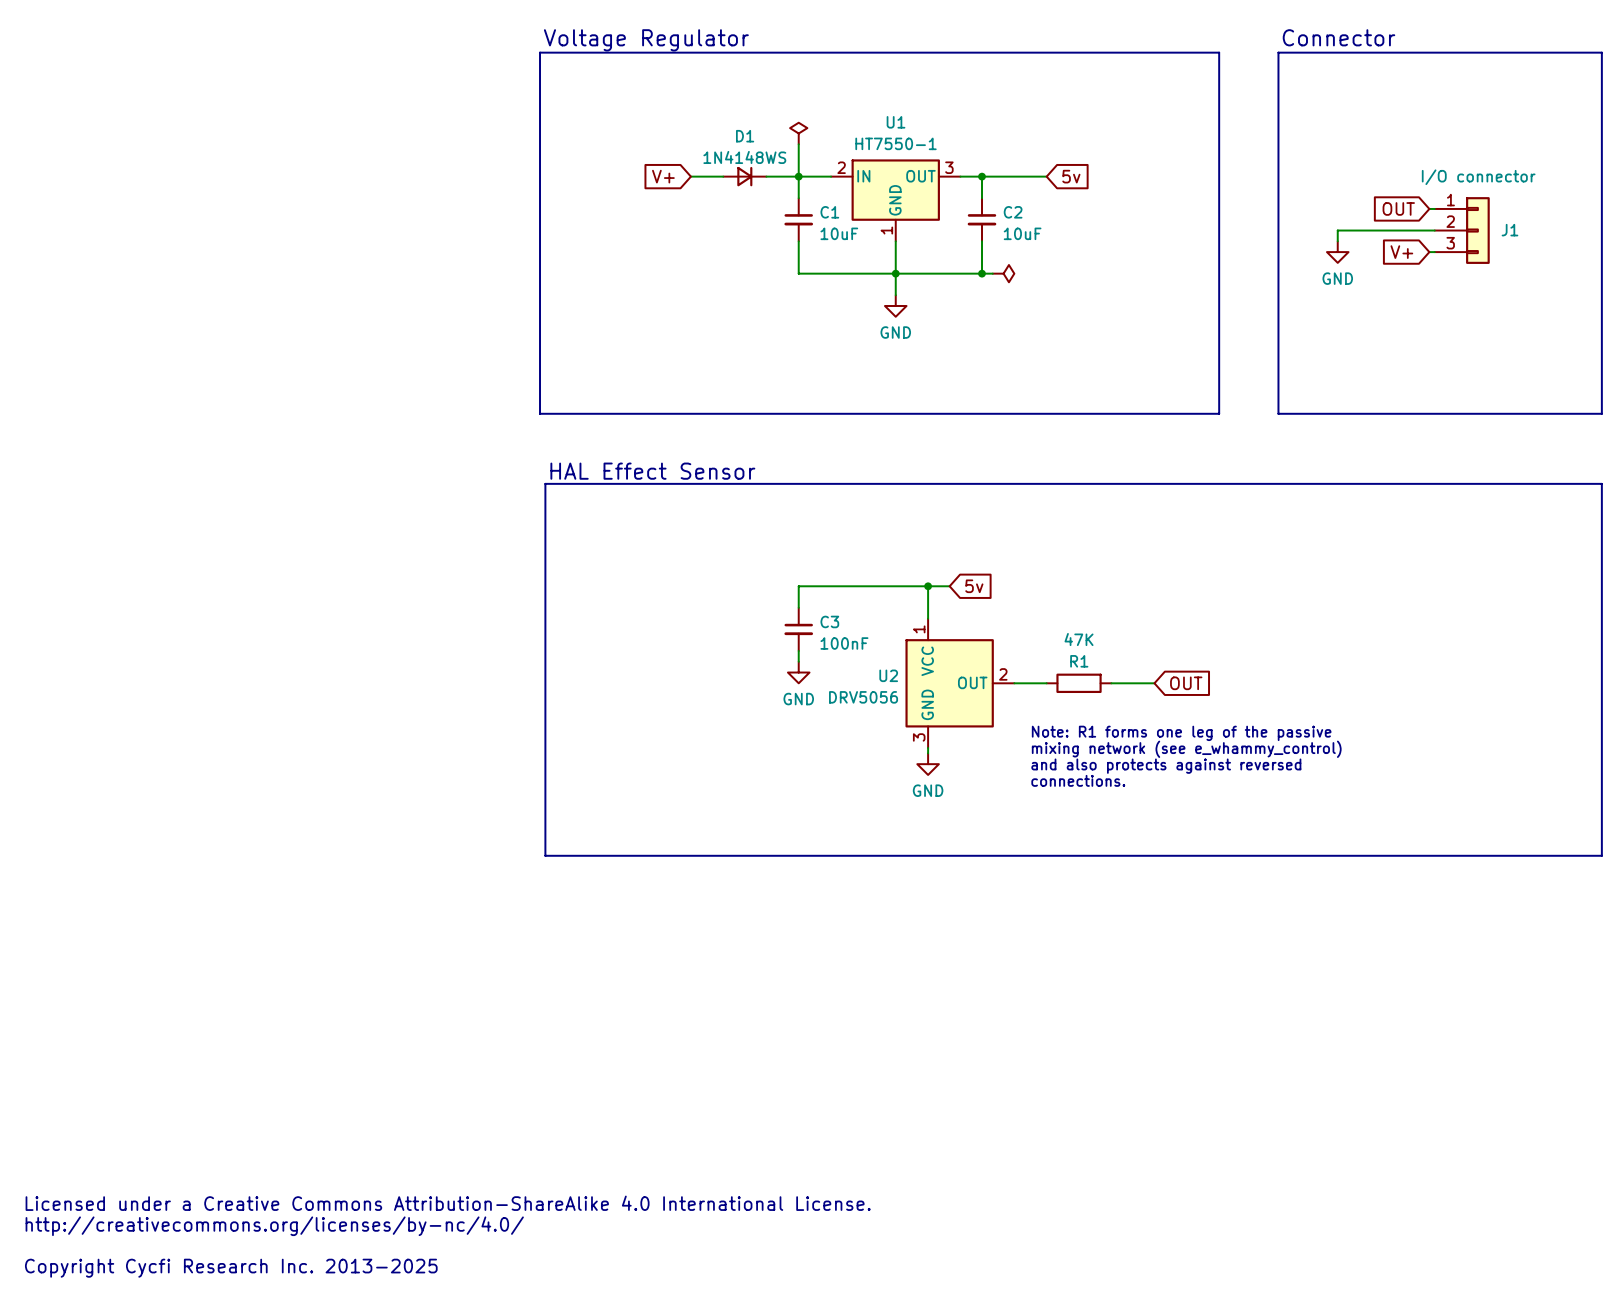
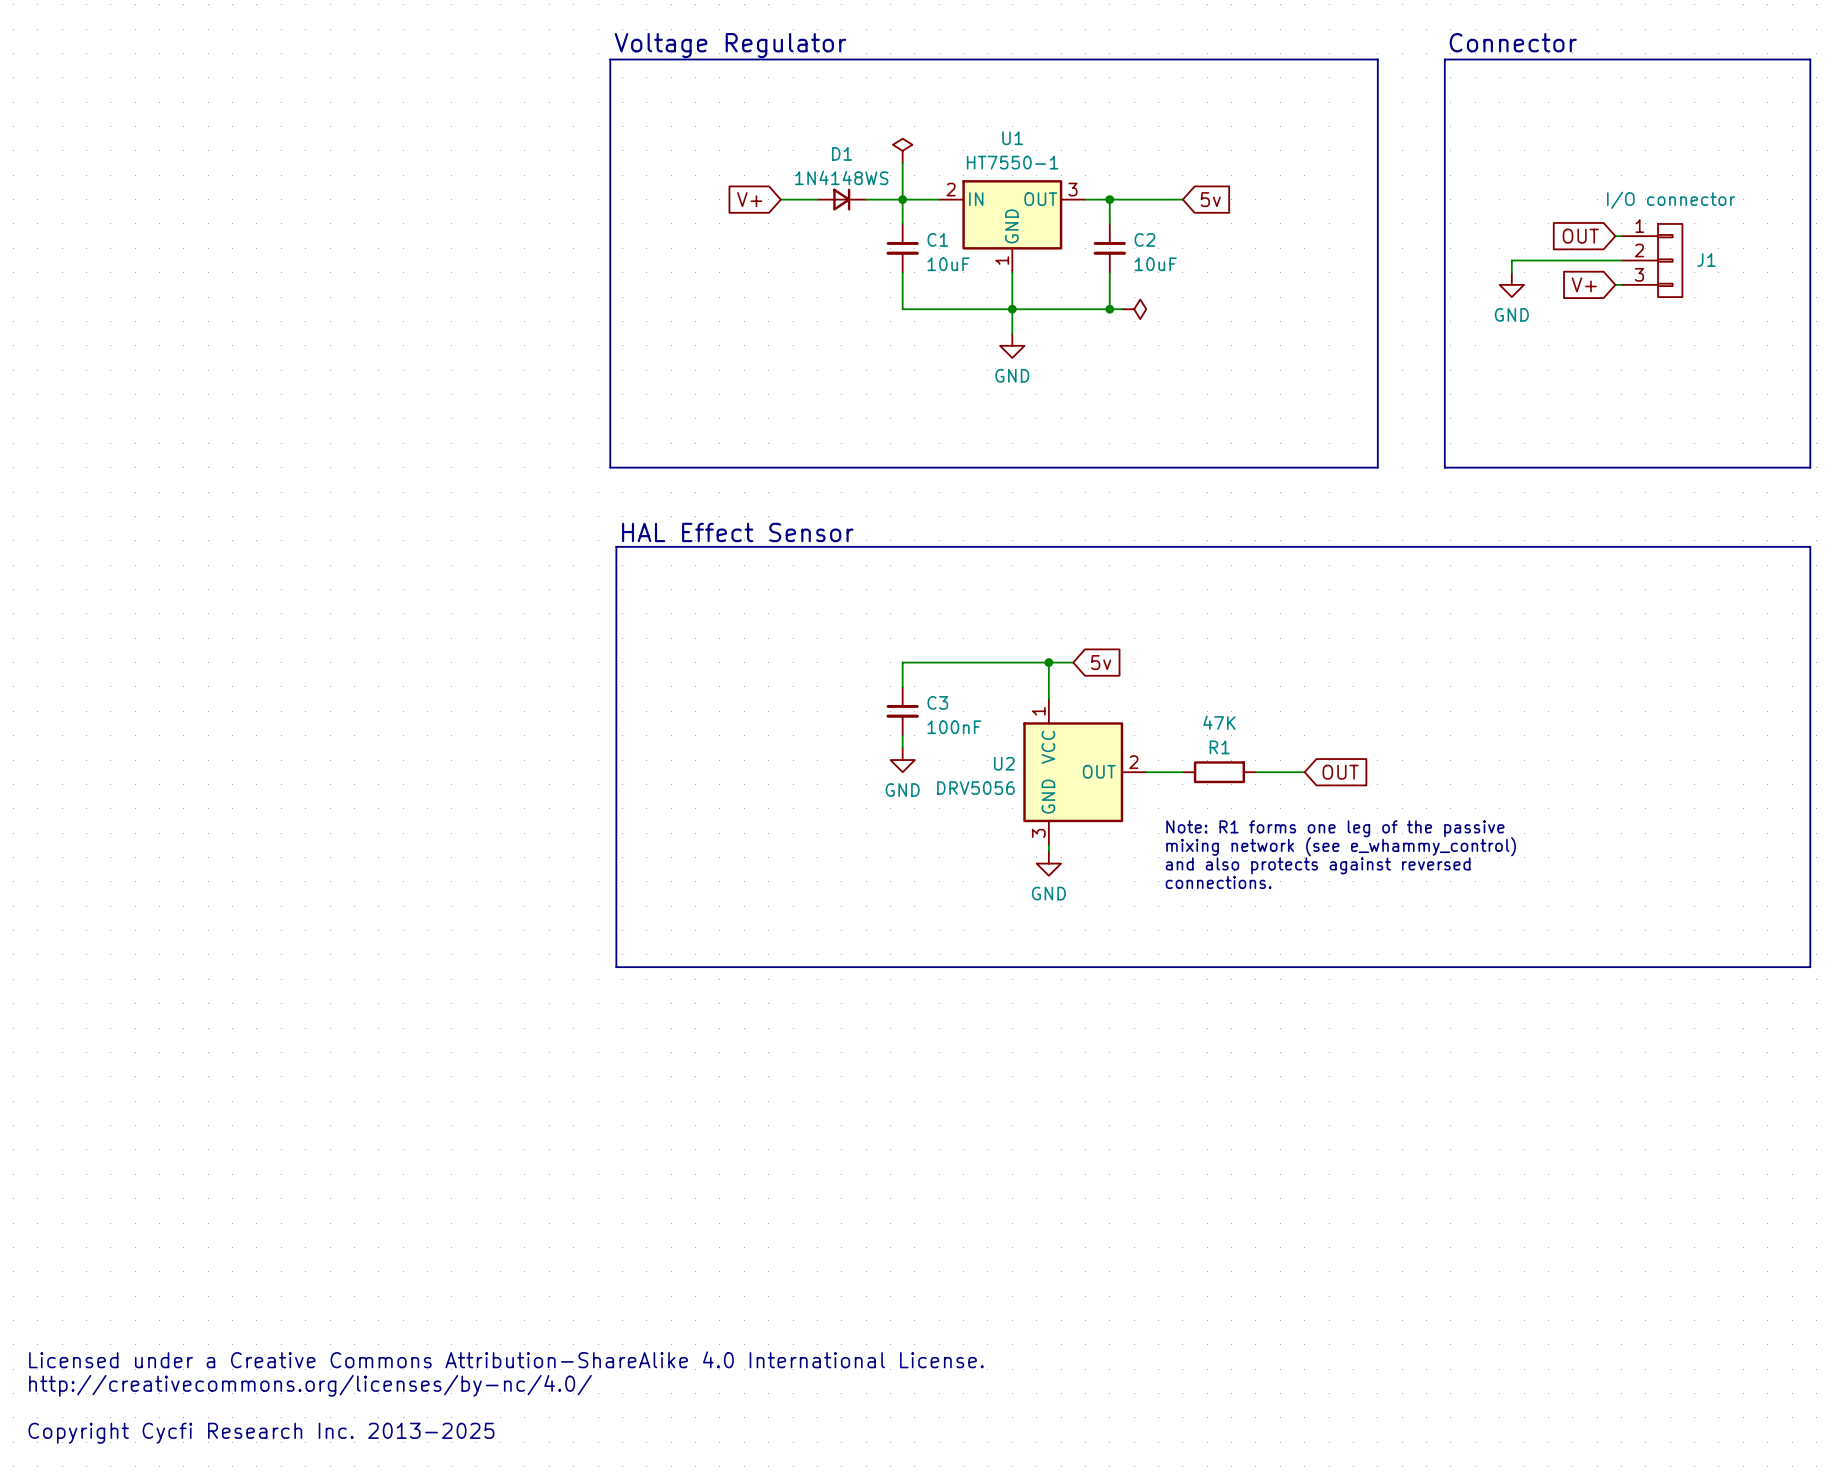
J1 symbol: [1434, 197, 1490, 264] -> [1621, 223, 1683, 298]

